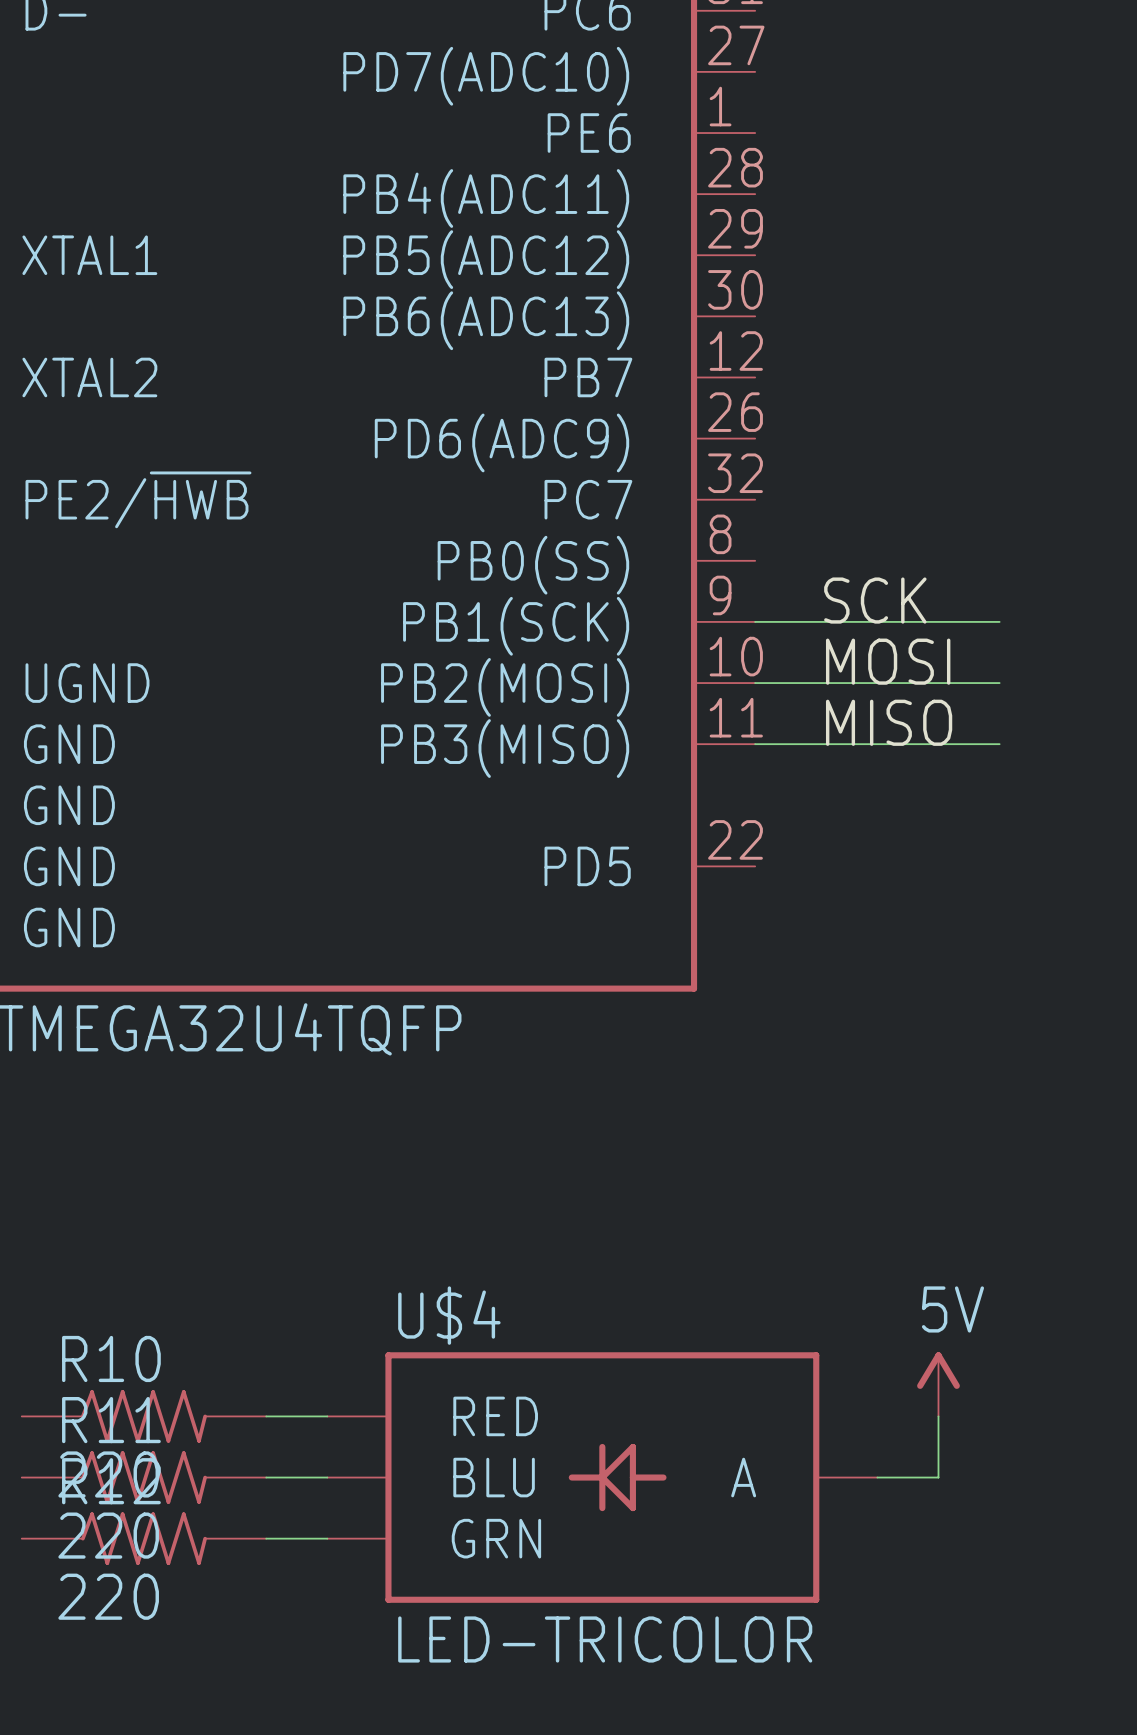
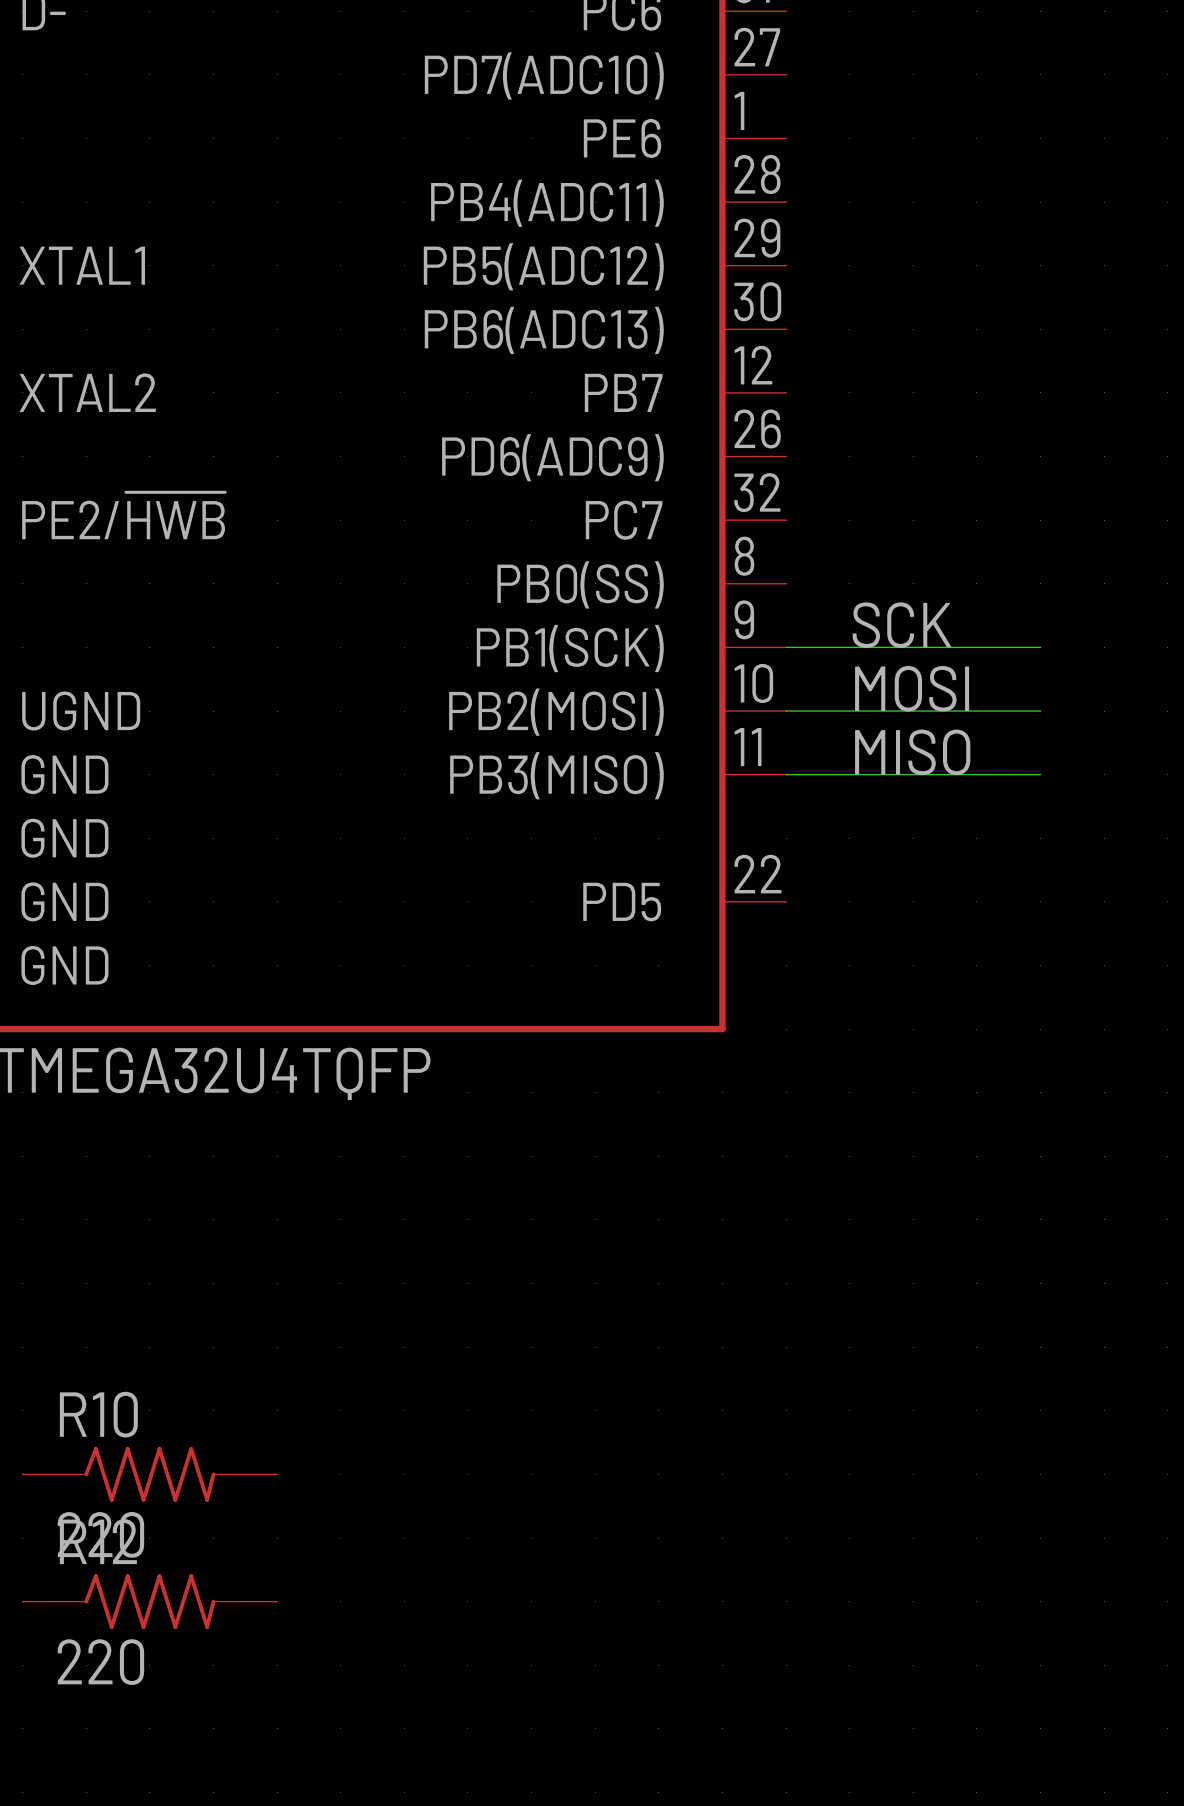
power symbol: 5V (938, 1384) -> none
wire: (266, 1416) (327, 1416) -> none
wire: (938, 1416) (938, 1477) (877, 1477) -> none
R11: 220 (144, 1477) -> none
wire: (266, 1477) (327, 1477) -> none
U$4: LED-TRICOLOR (602, 1477) -> none
wire: (266, 1538) (327, 1538) -> none

